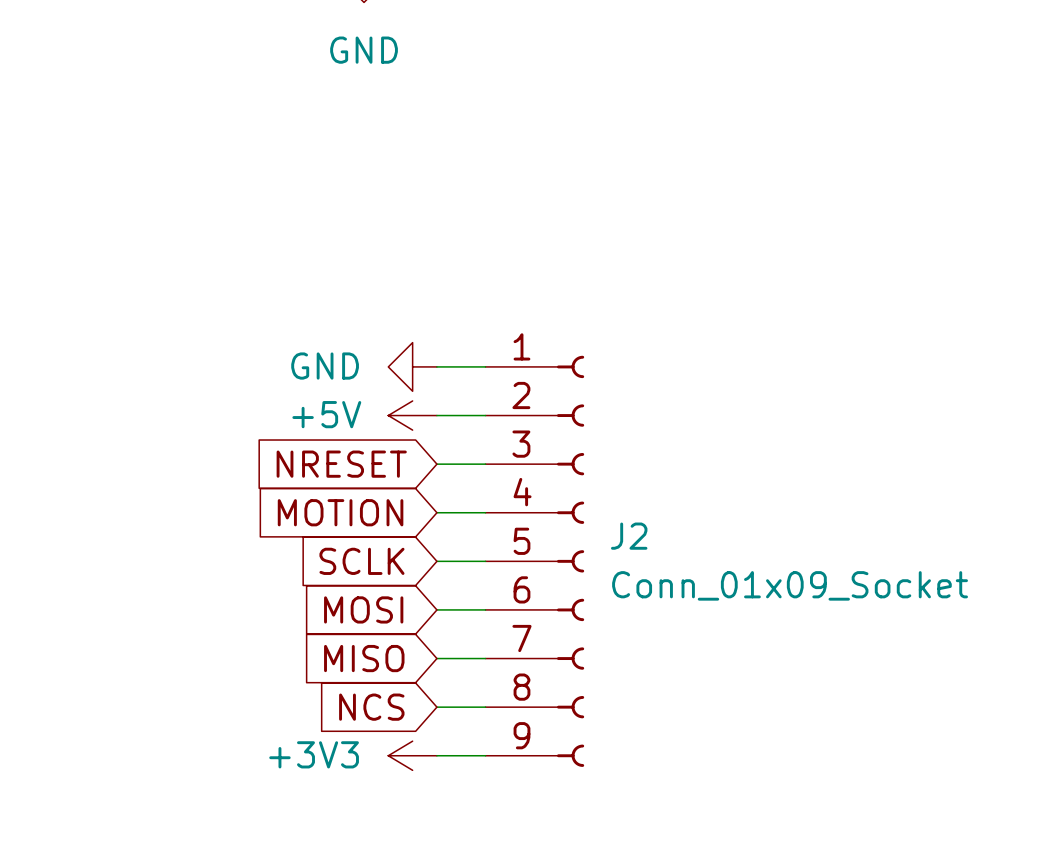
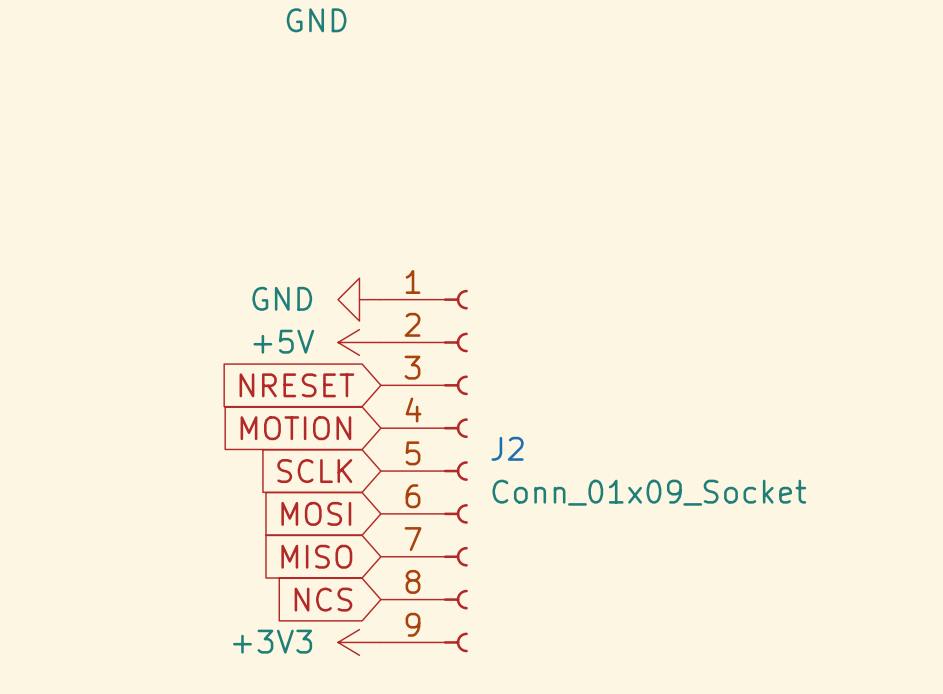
J2 position: (534, 561) -> (424, 471)

